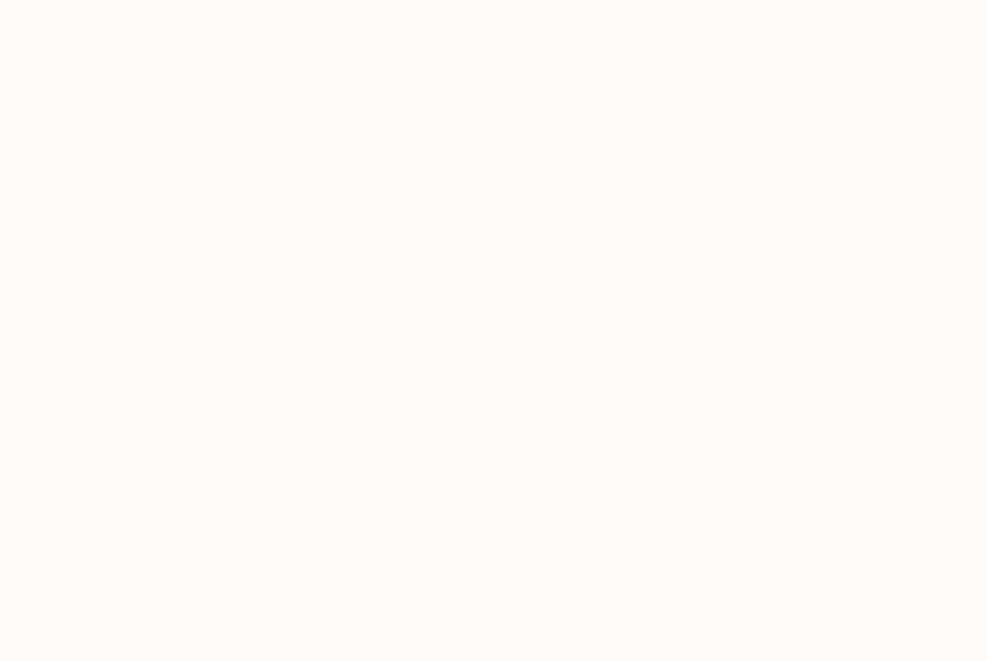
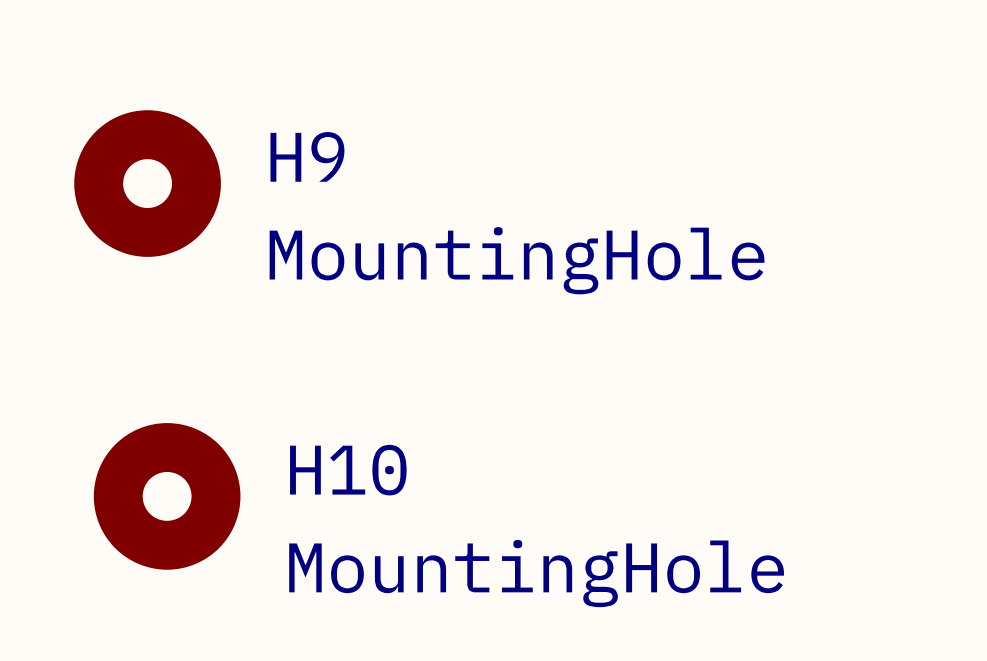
H9: none -> MountingHole (147, 183)
H10: none -> MountingHole (167, 496)

